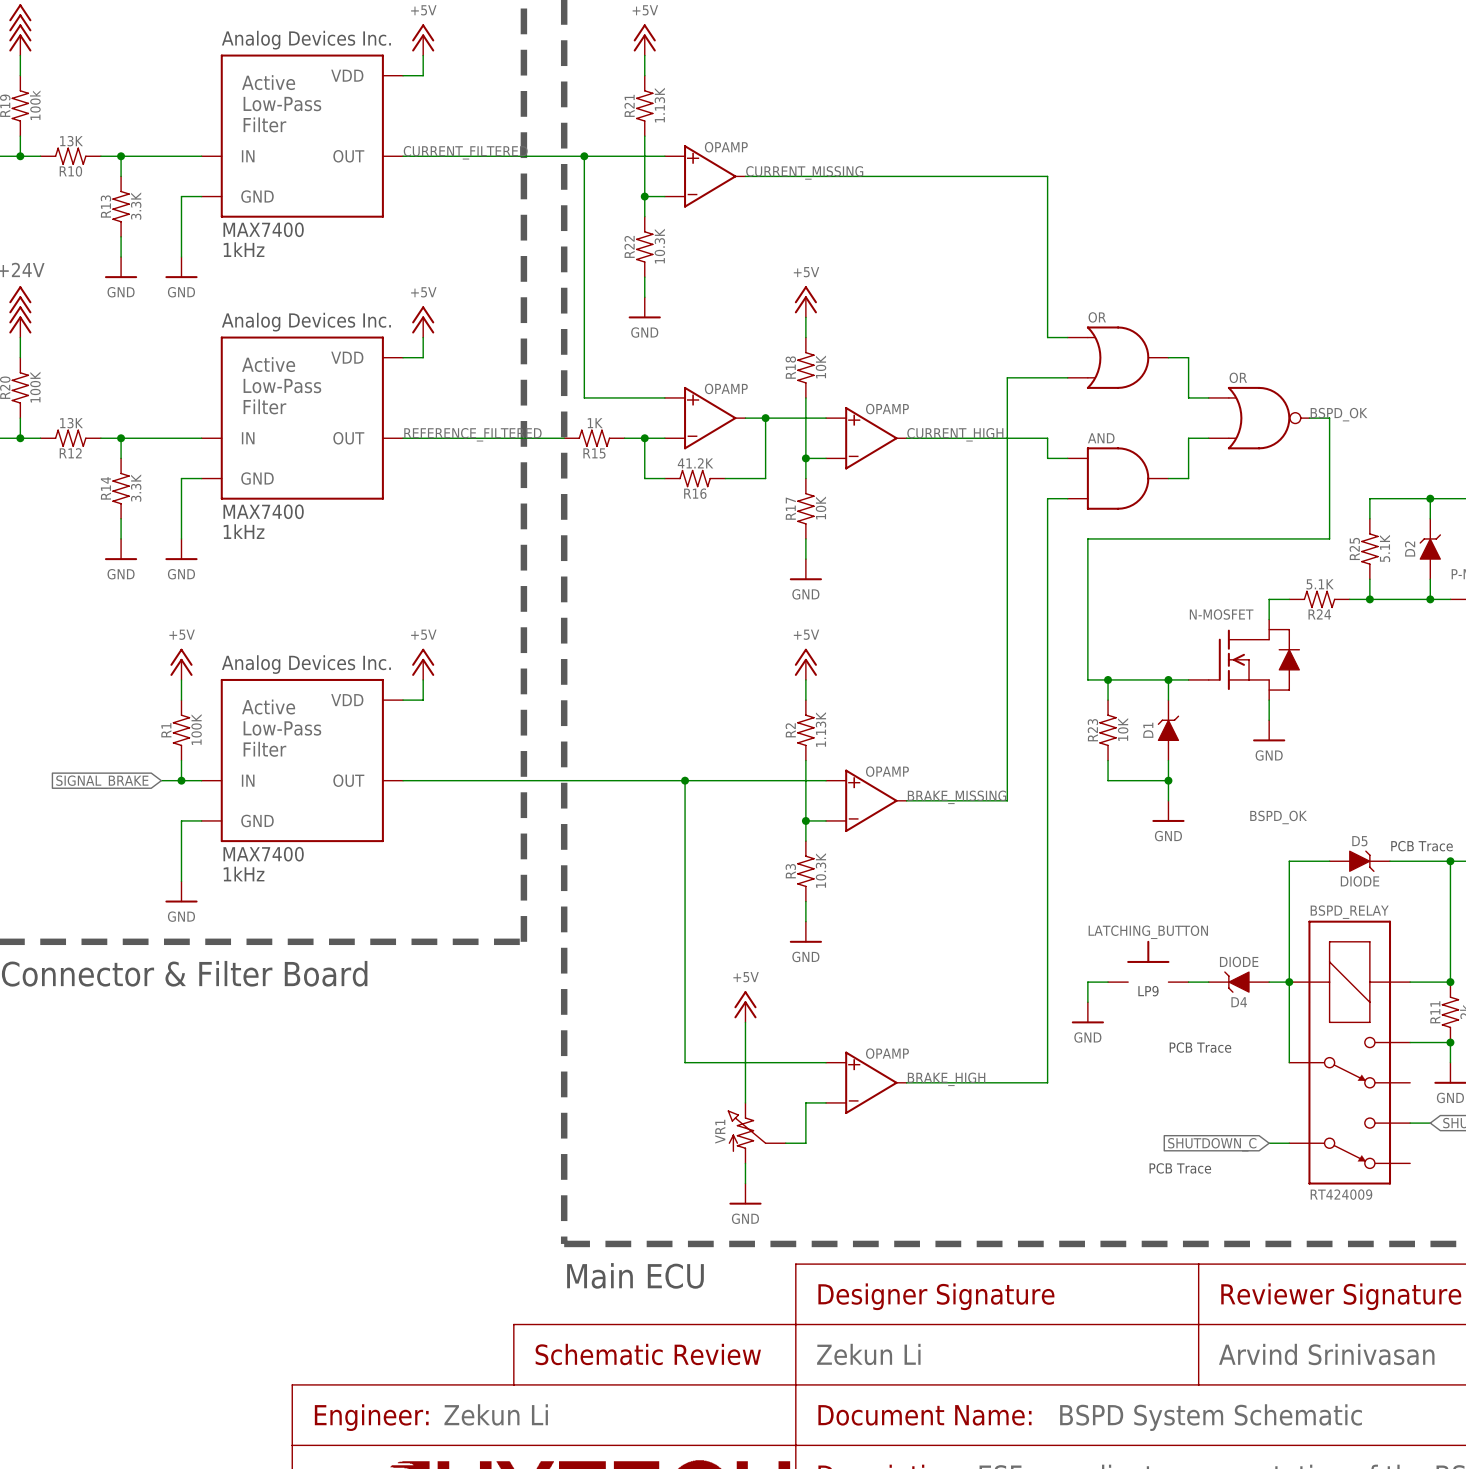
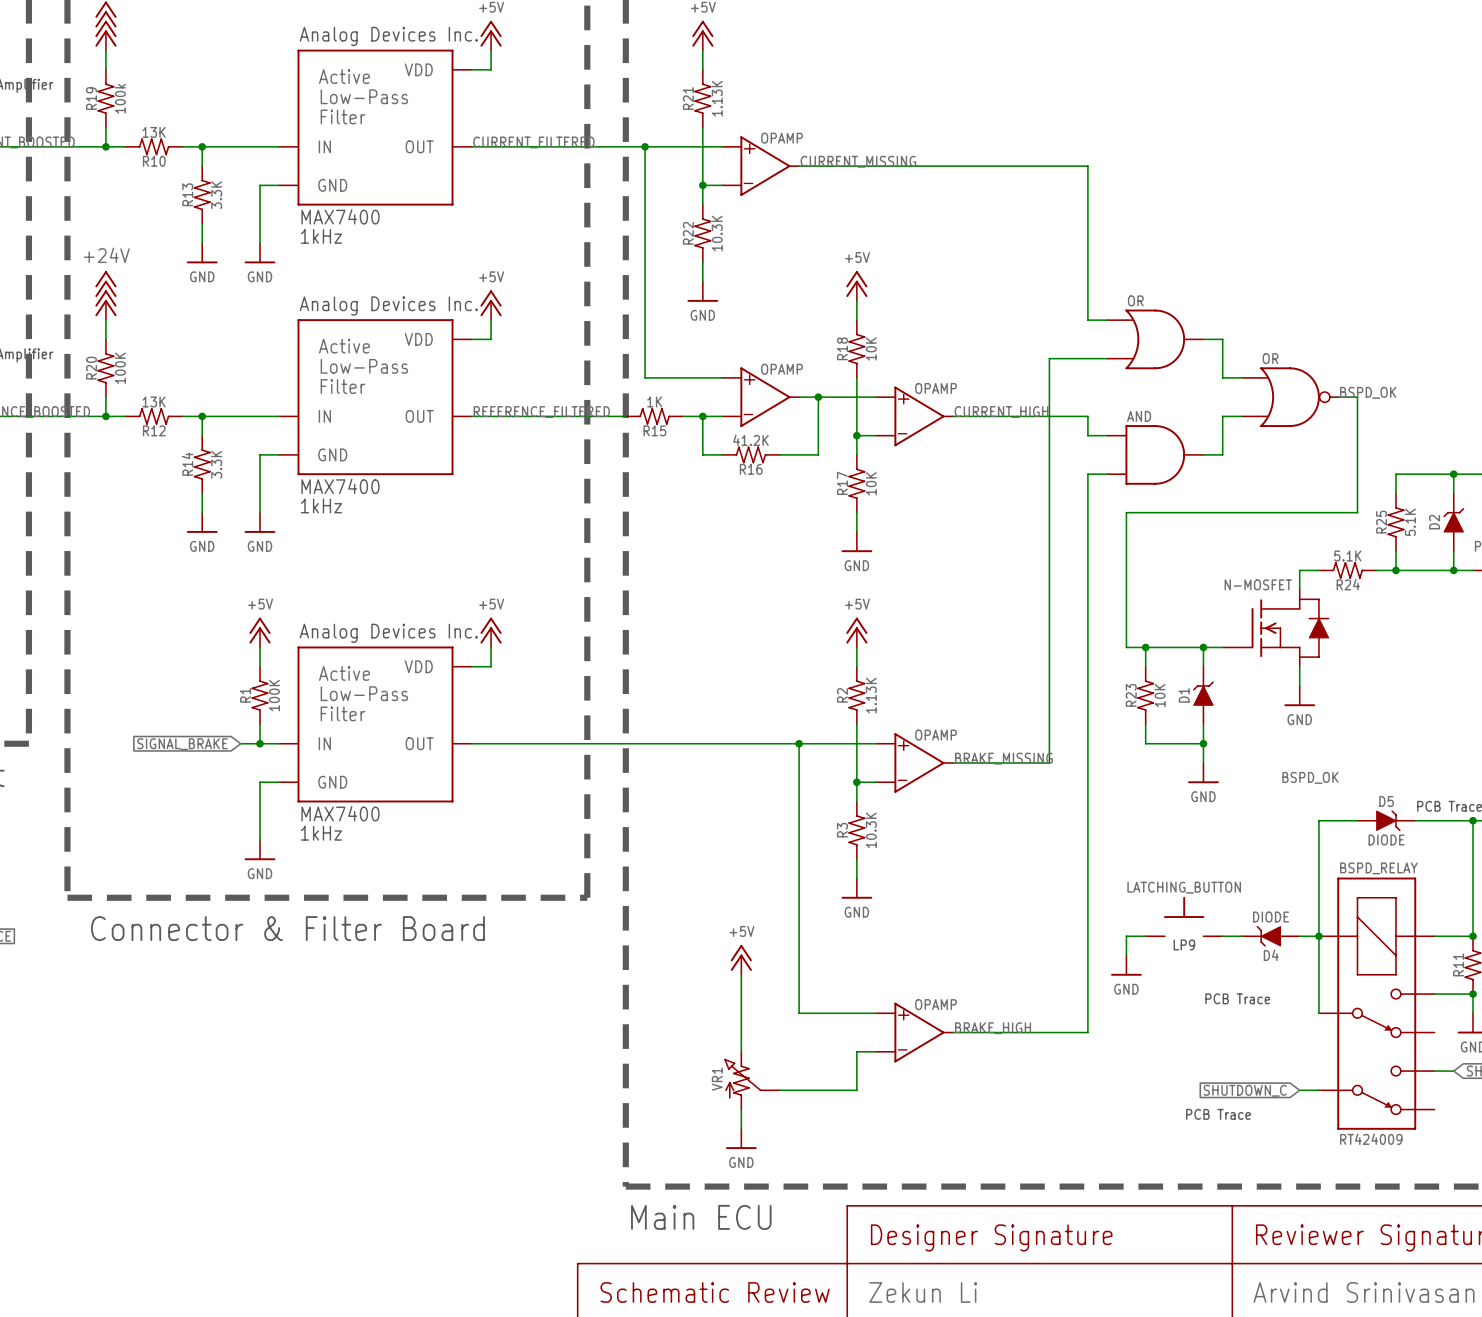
wire: (685, 780) (685, 1022) -> (799, 743) (799, 974)
junction: (685, 780) -> none
junction: none -> (799, 743)
power symbol position: +5V (745, 1006) -> +5V (741, 959)
wire: (685, 1062) (745, 1062) (745, 1102) -> (741, 1013) (741, 1051)
VR1 position: (756, 1133) -> (752, 1080)
wire: (745, 1163) (745, 1183) -> (741, 1109) (741, 1128)
power symbol position: GND (745, 1194) -> GND (741, 1138)

